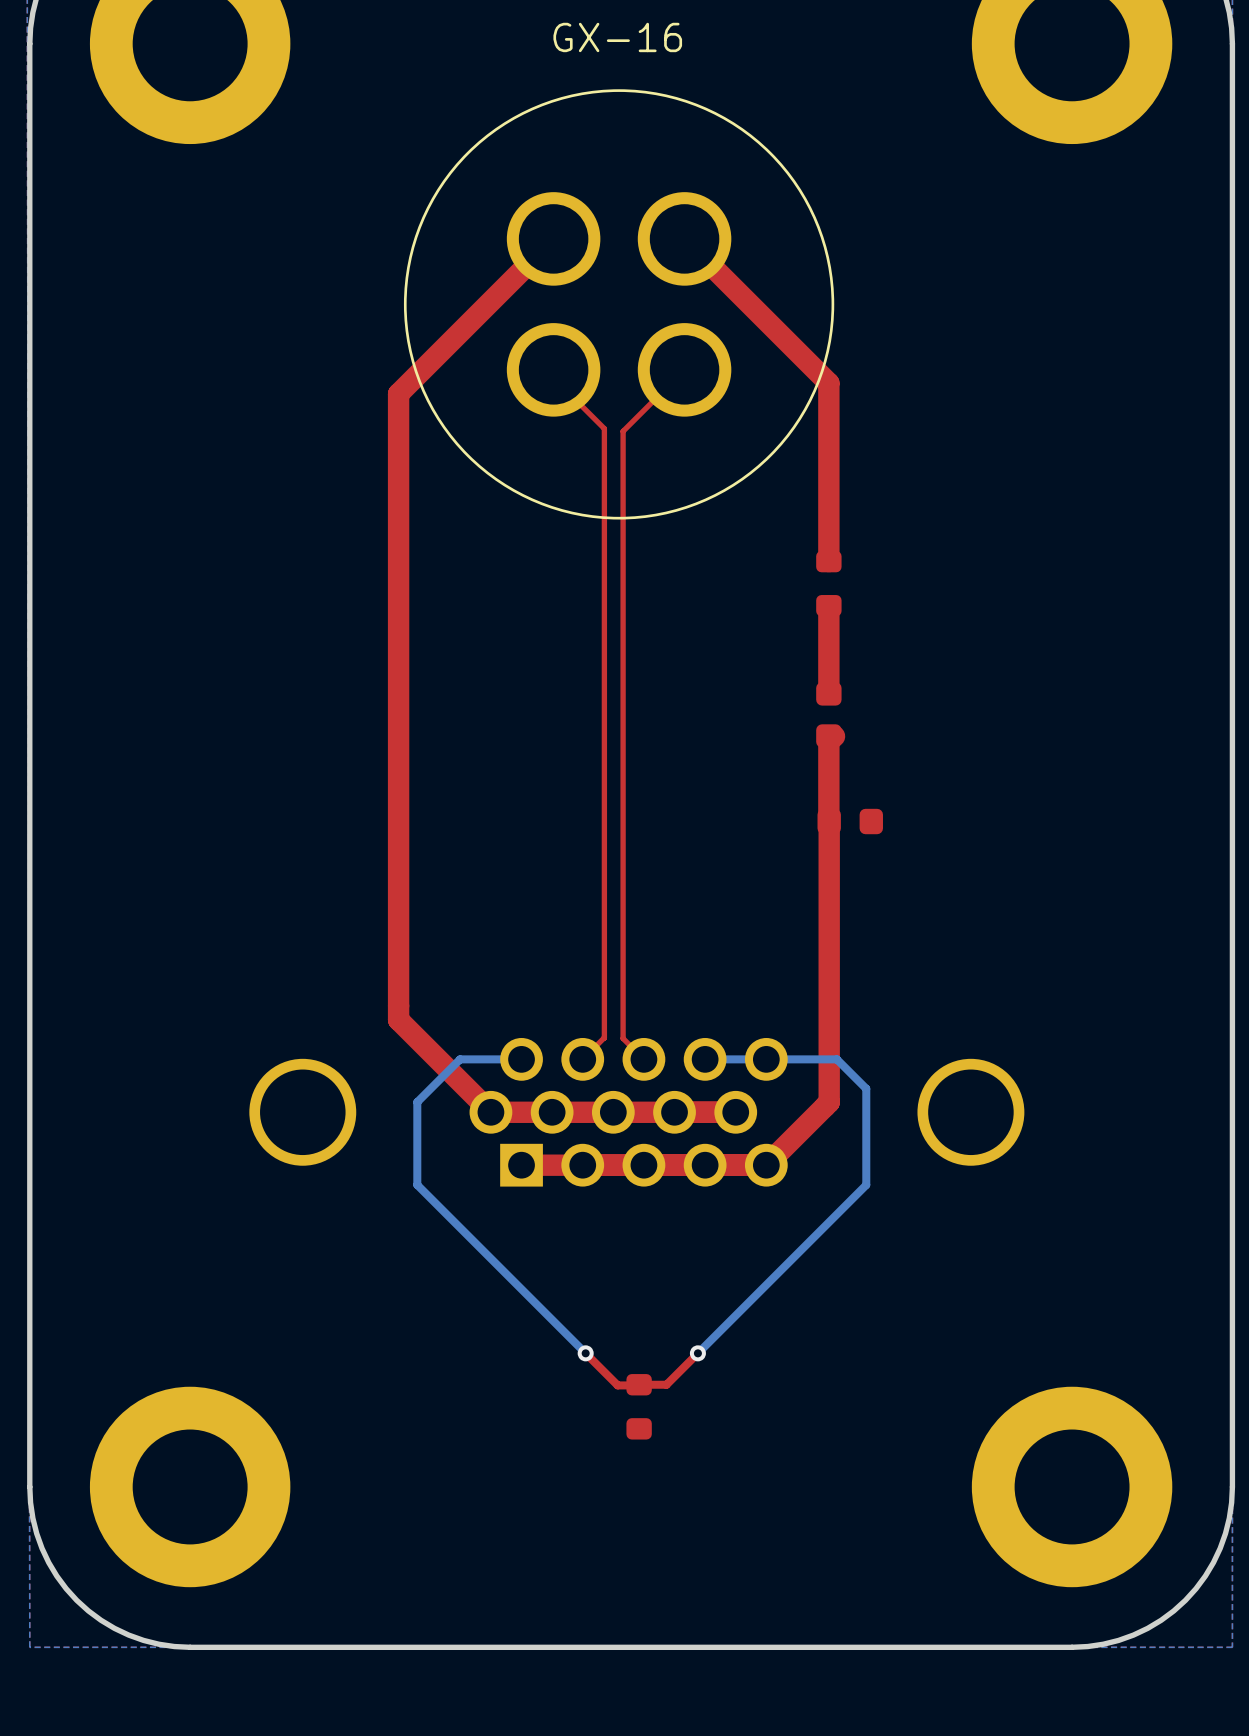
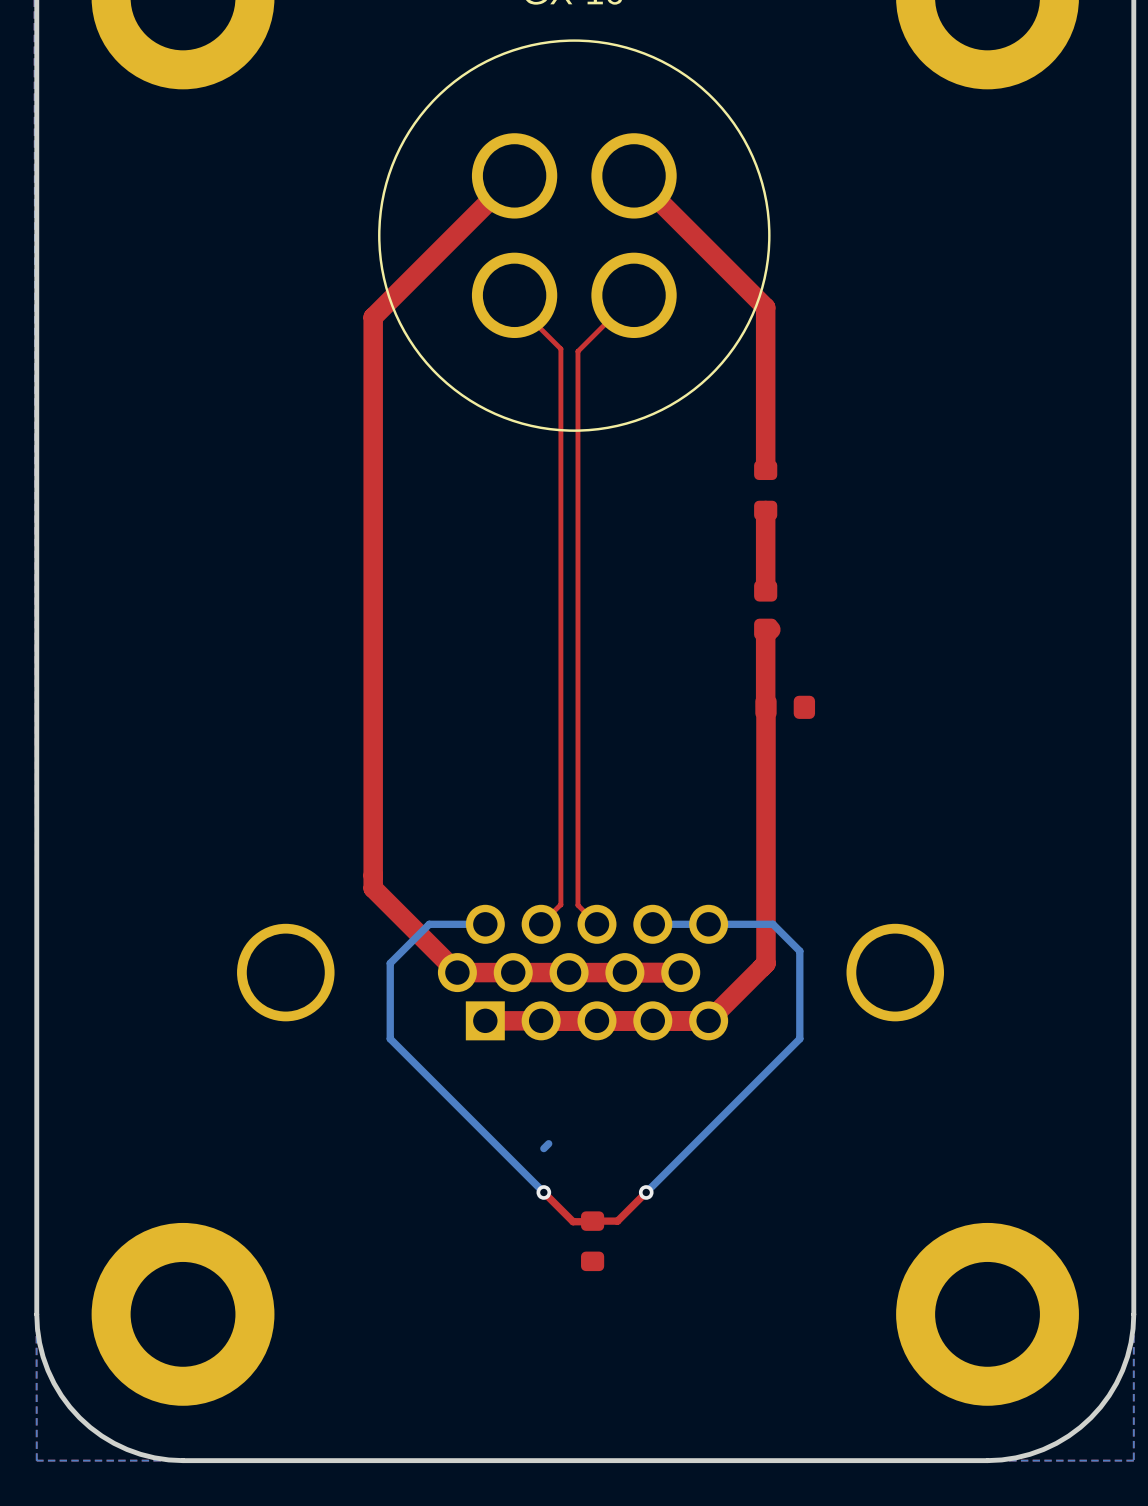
bottom track: none -> (548, 1143) (543, 1148)

